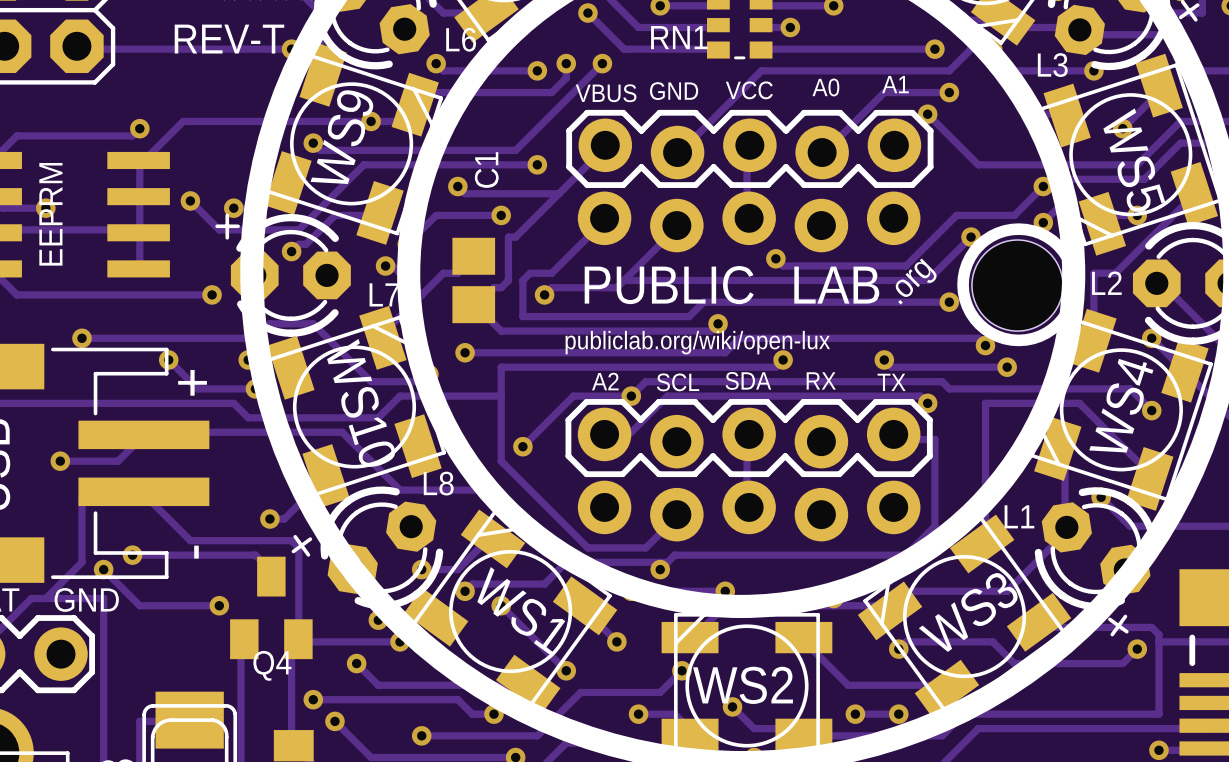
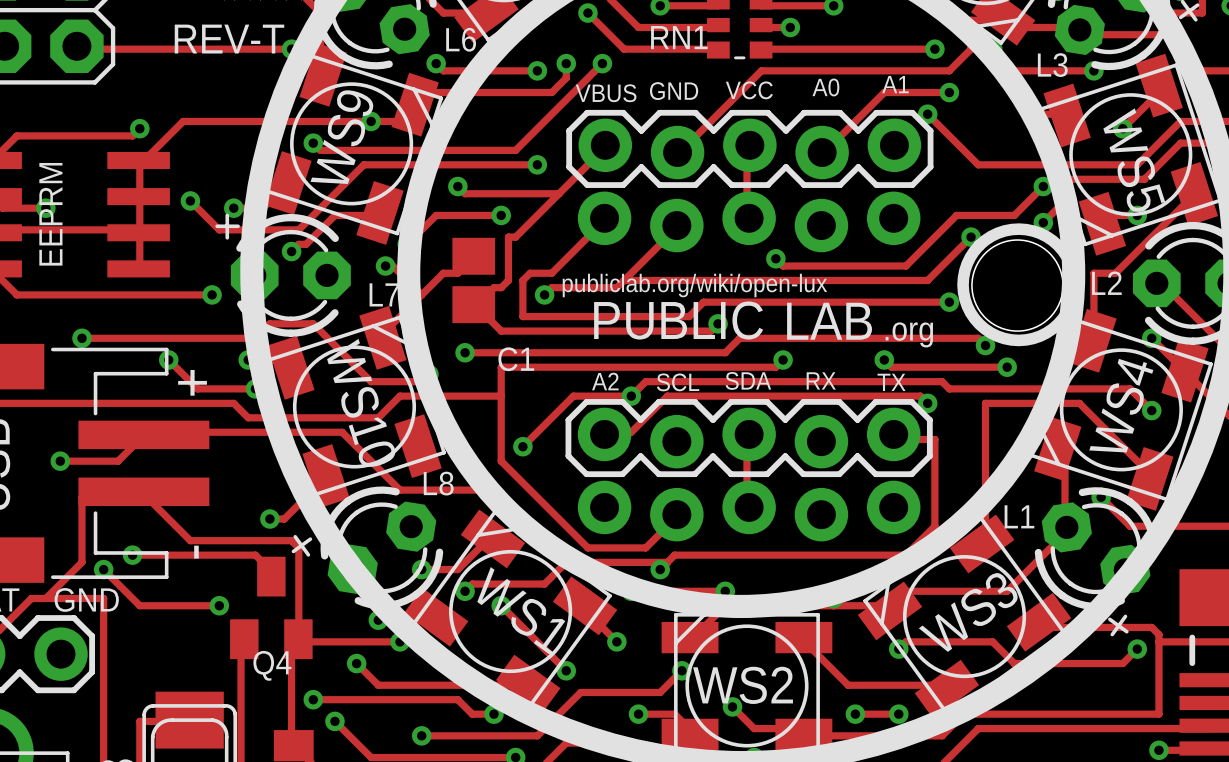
C1 name rotation: 0° (486, 170) -> 90° clockwise (516, 359)
C1 name position: C1 (486, 170) -> C1 (516, 359)
text rotation: 0° (915, 281) -> 45° clockwise (909, 334)
text position: PUBLIC (669, 285) -> PUBLIC (678, 320)
text position: LAB (836, 285) -> LAB (829, 321)
text position: publiclab.org/wiki/open-lux (697, 342) -> publiclab.org/wiki/open-lux (694, 285)

